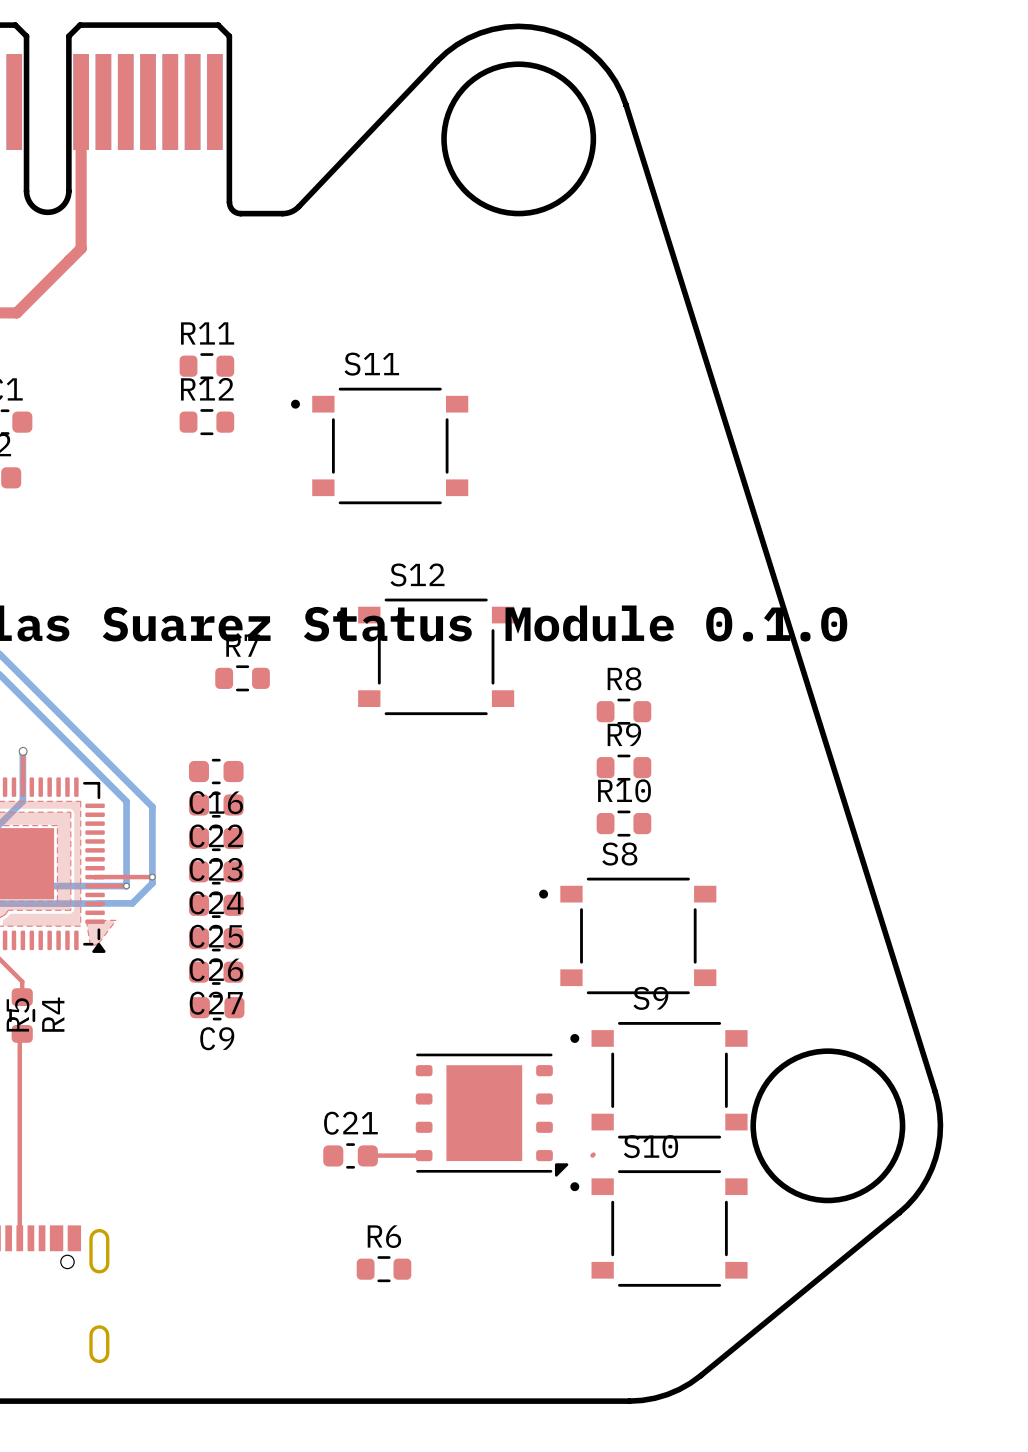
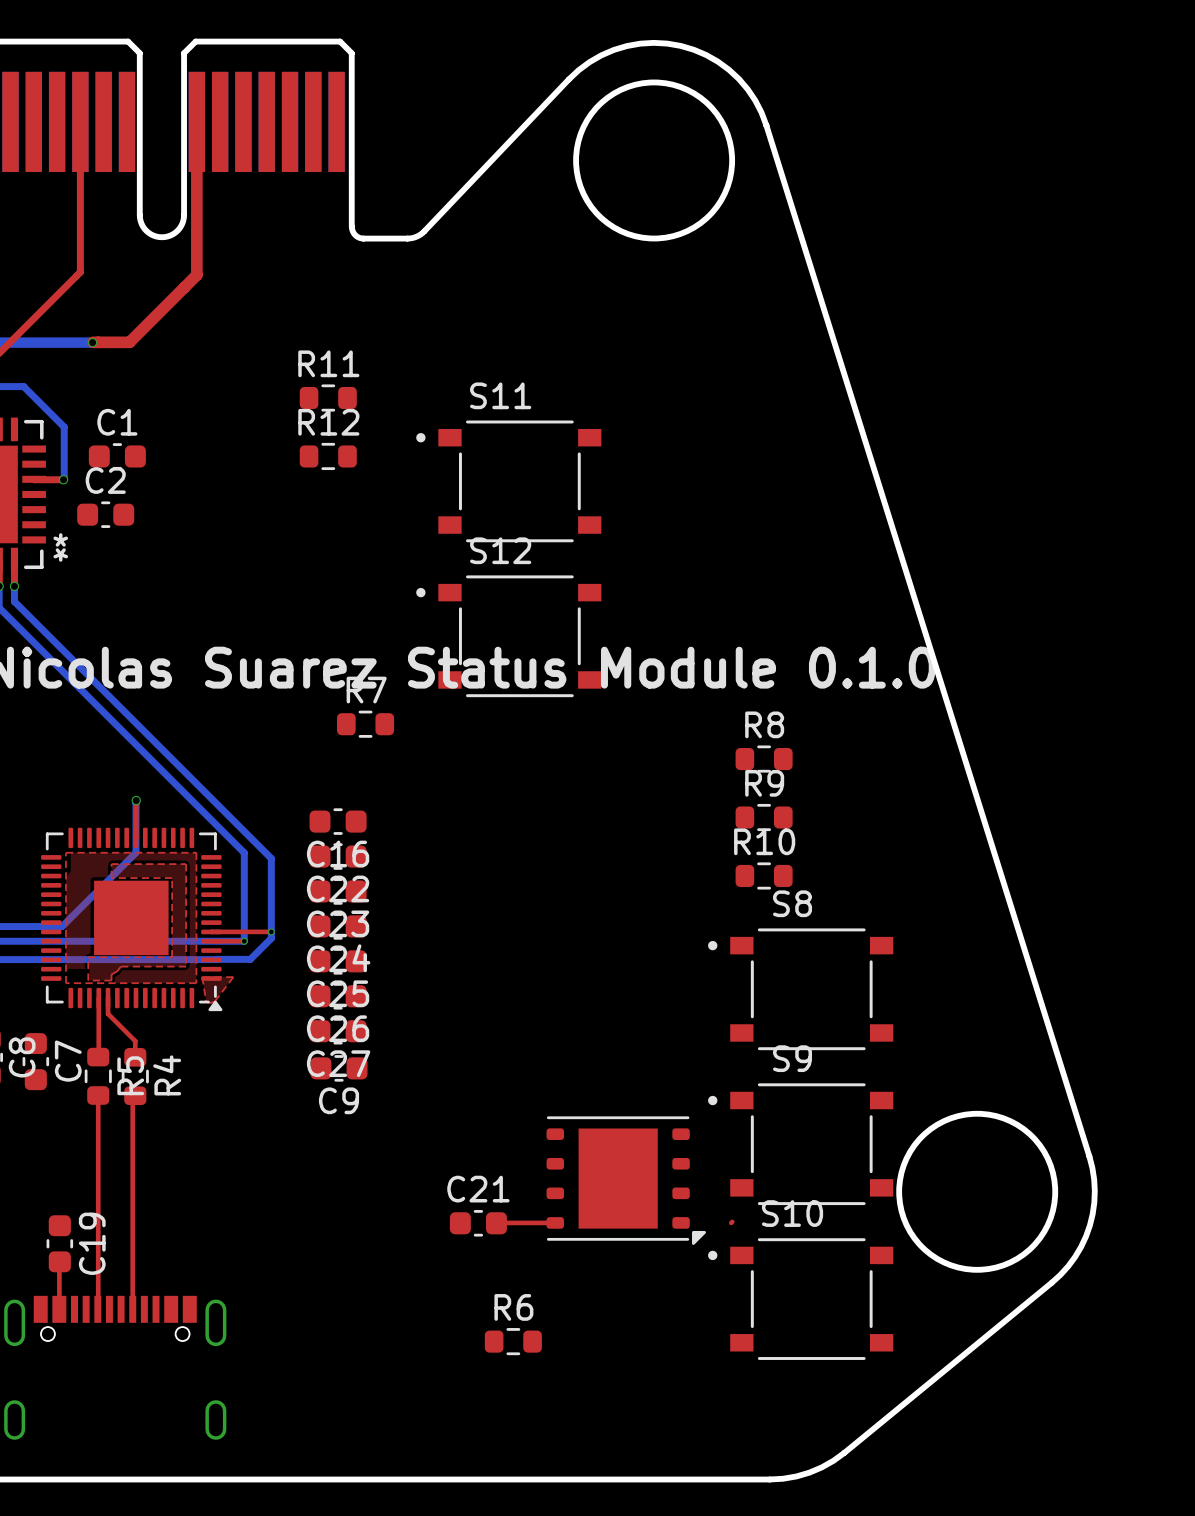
S12 position: (425, 656) -> (508, 636)
S8 position: (627, 935) -> (800, 989)

